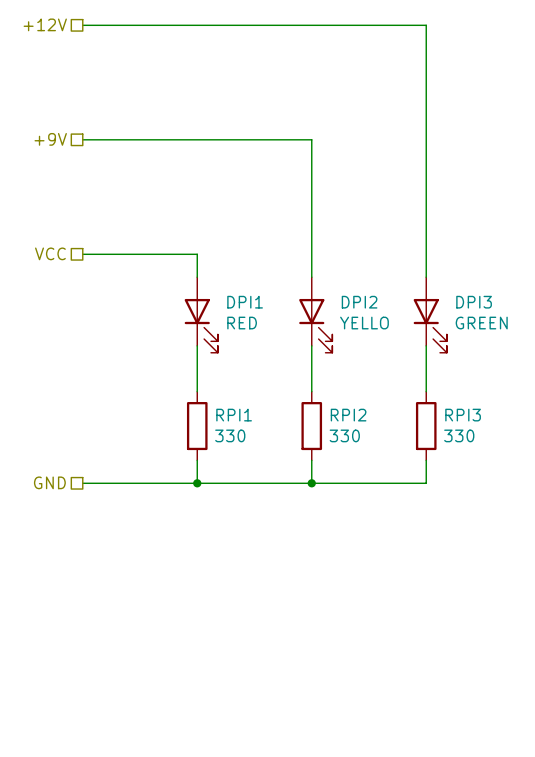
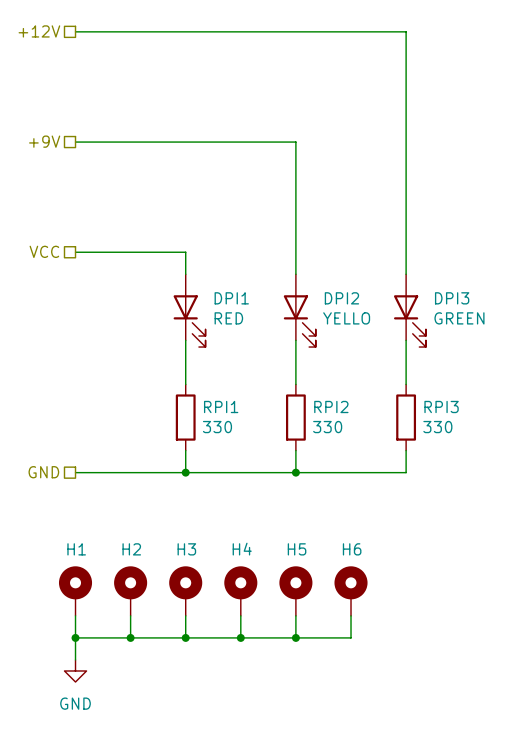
H1: none -> (75, 591)
H2: none -> (130, 591)
H3: none -> (185, 591)
H4: none -> (240, 591)
H5: none -> (295, 591)
H6: none -> (351, 591)
wire: none -> (75, 615) (75, 659)
wire: none -> (130, 615) (130, 637)
wire: none -> (185, 615) (185, 637)
wire: none -> (240, 615) (240, 637)
wire: none -> (295, 615) (295, 637)
wire: none -> (351, 615) (351, 637) (75, 637)
junction: none -> (75, 637)
junction: none -> (130, 637)
junction: none -> (185, 637)
junction: none -> (240, 637)
junction: none -> (295, 637)
power symbol: none -> GND (75, 670)

